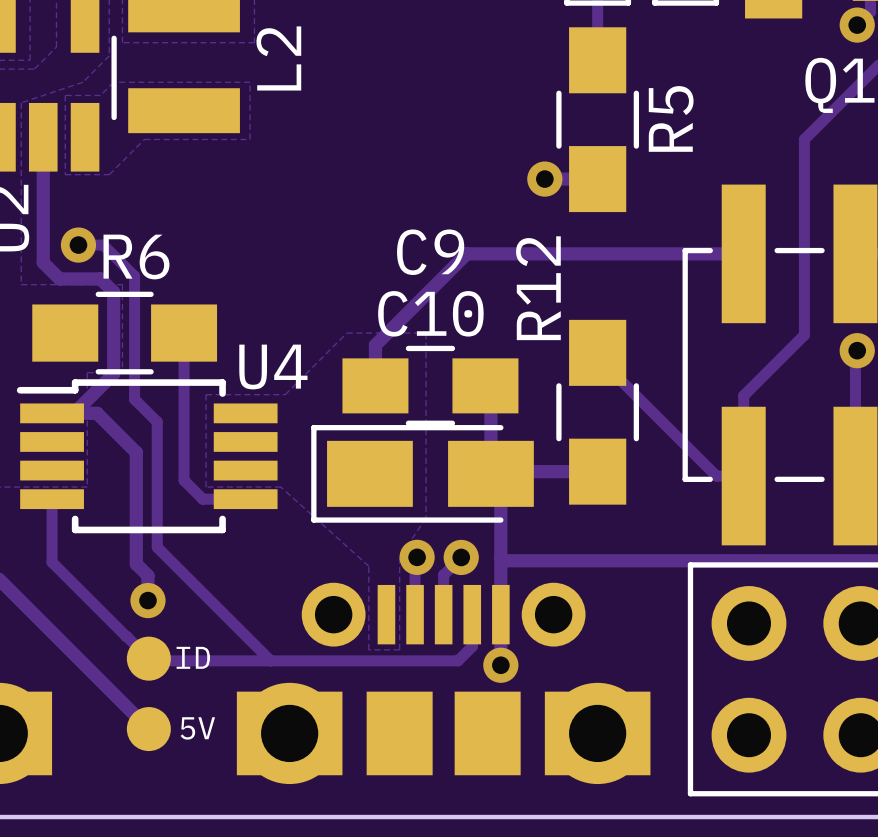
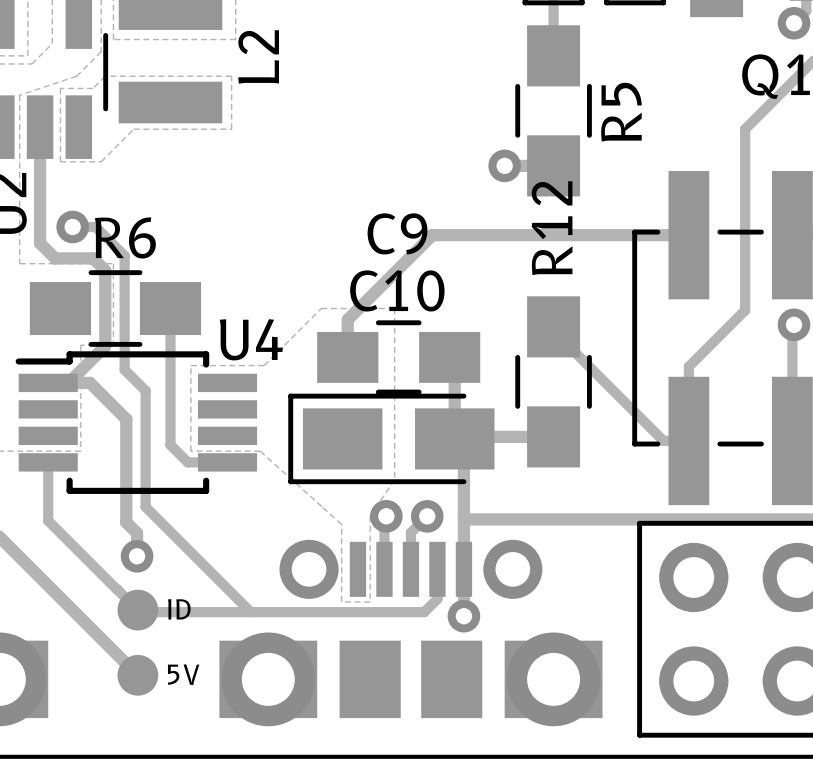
R12 name position: R12 (538, 288) -> R12 (552, 228)

